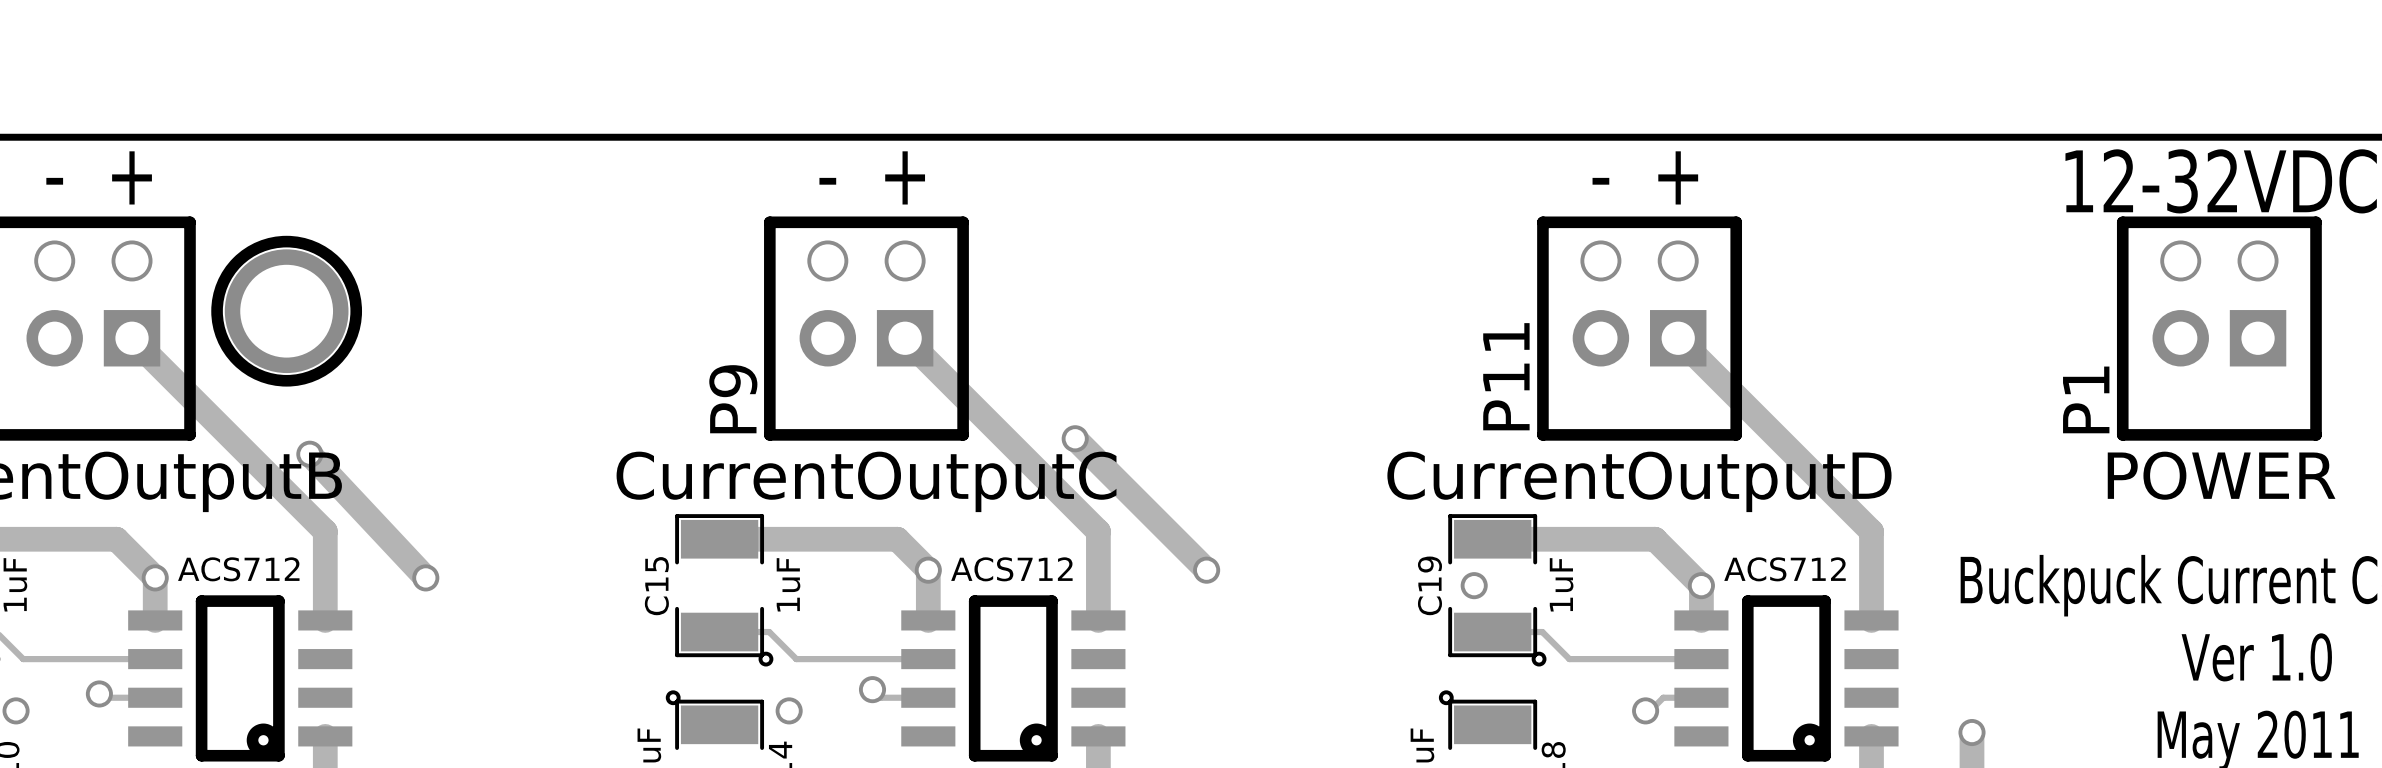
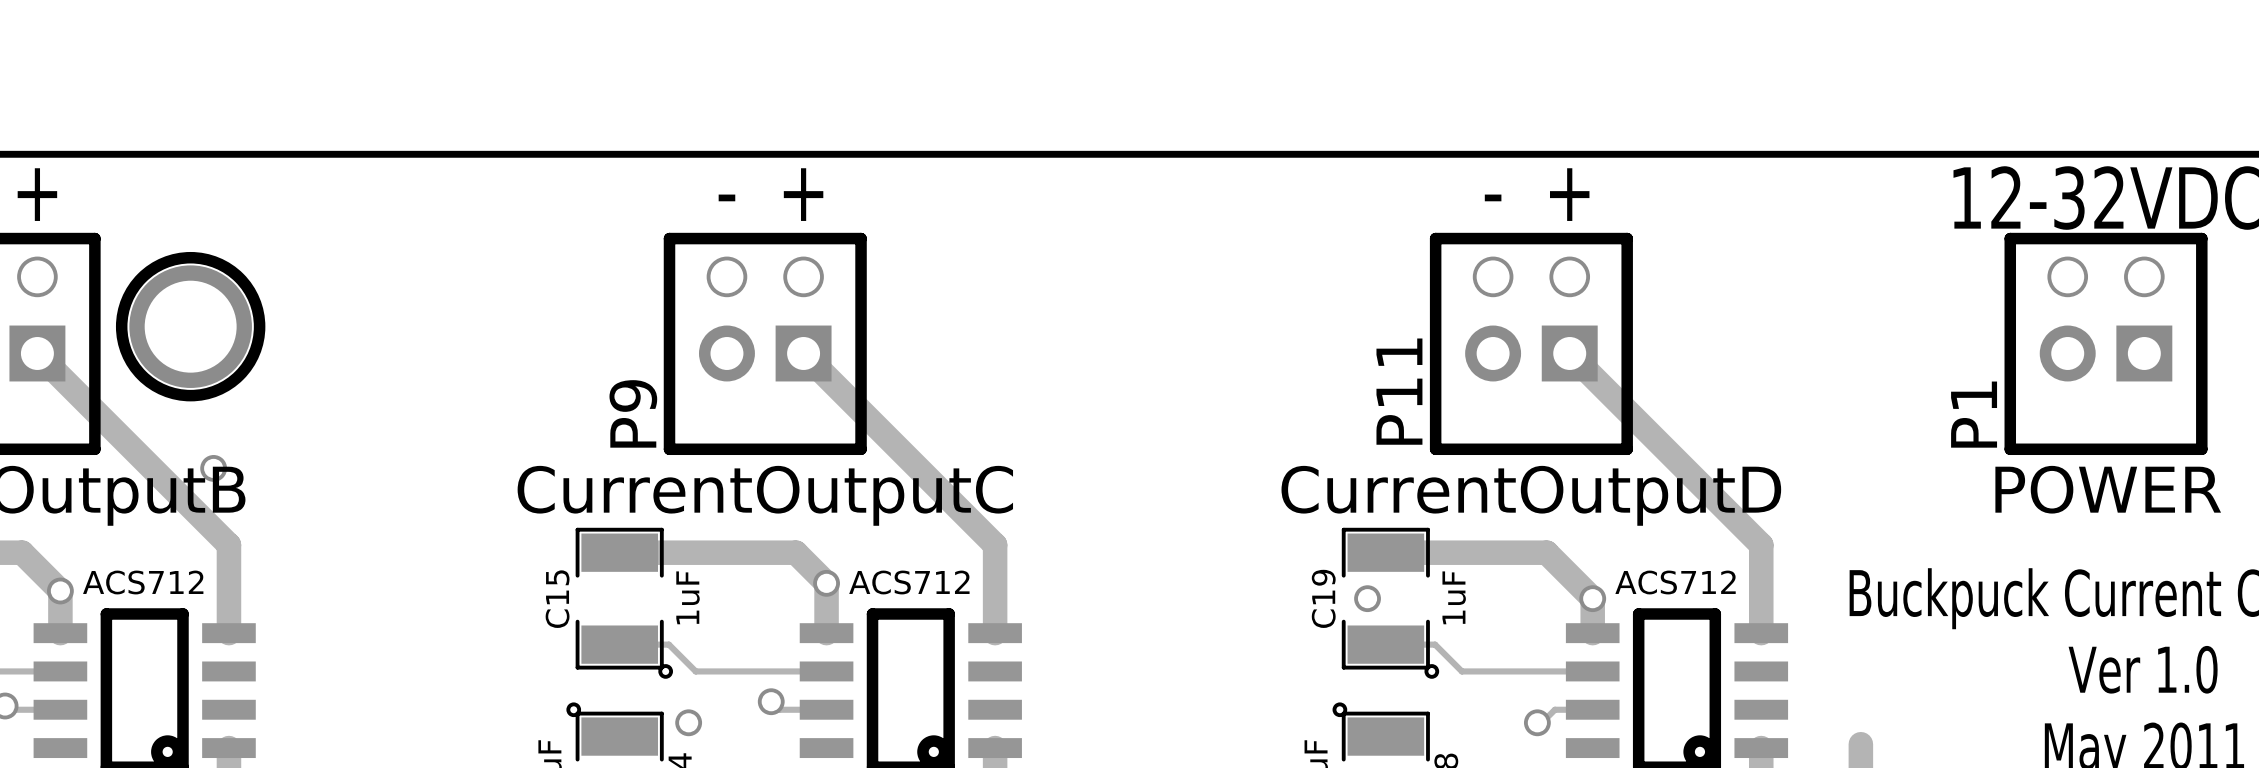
track: (1075, 438) (1206, 570) -> none
via: (1075, 438) -> none
track: (309, 454) (425, 577) -> none
via: (1206, 570) -> none
via: (425, 577) -> none
via: (1972, 732) -> none

